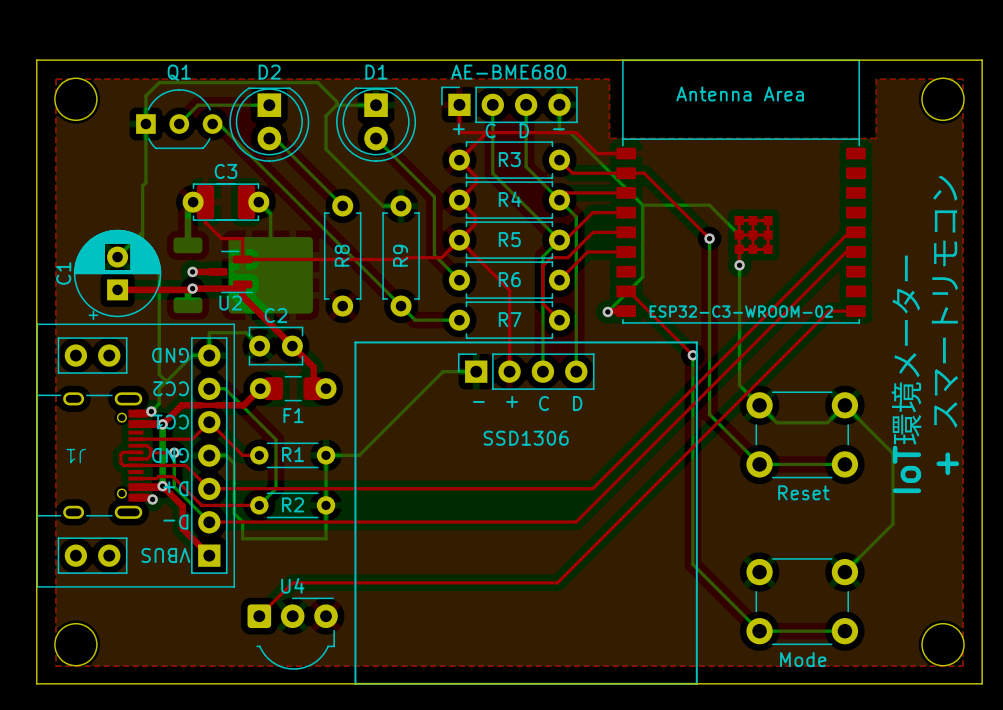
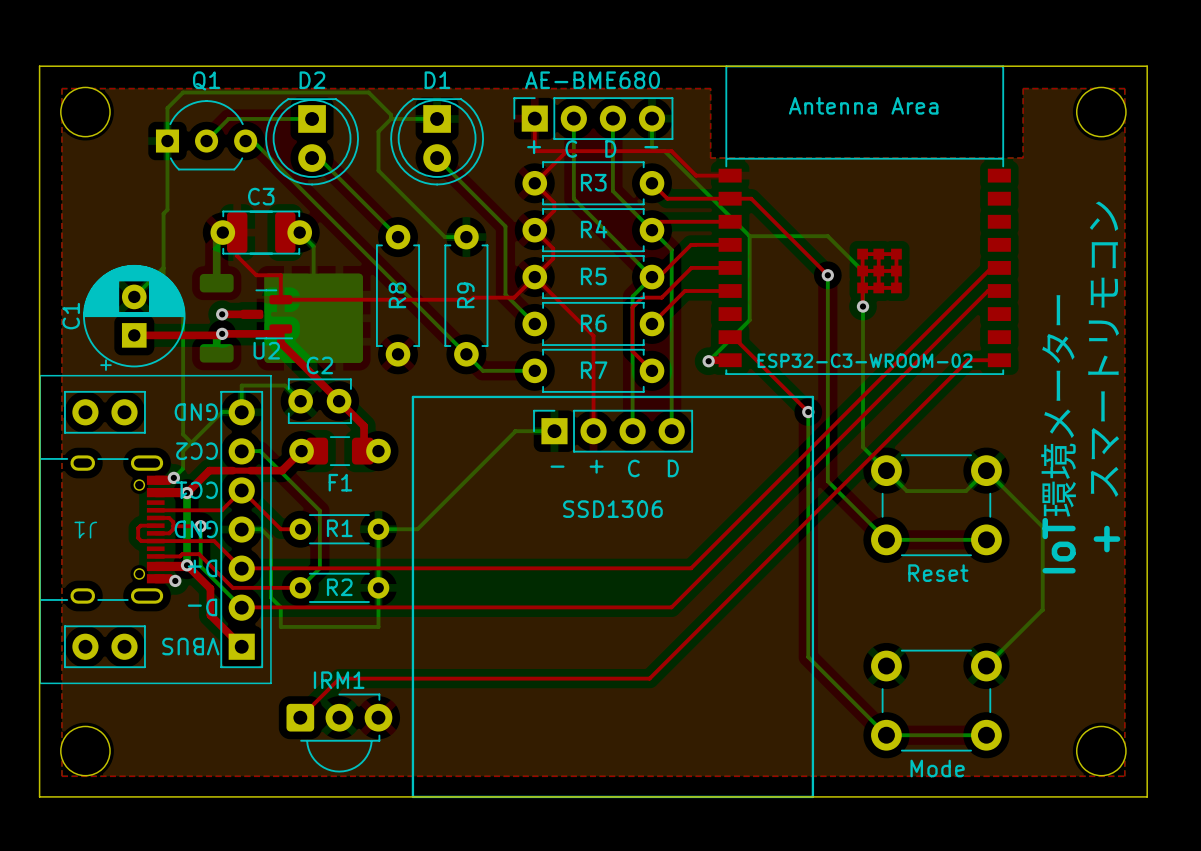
IRM1: none -> (339, 733)
U4: (292, 633) -> none

